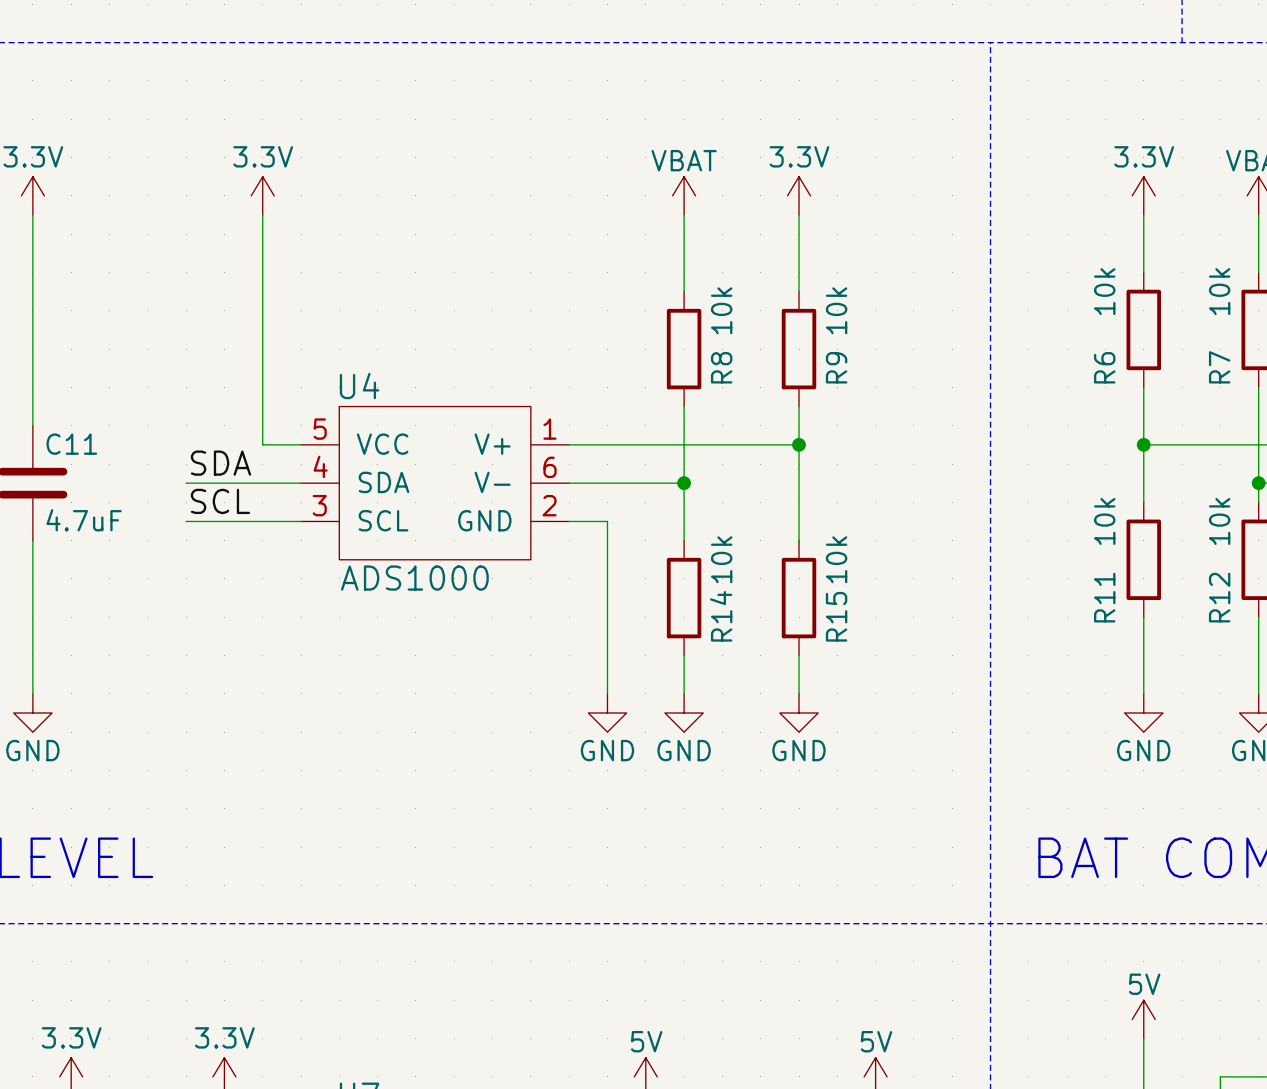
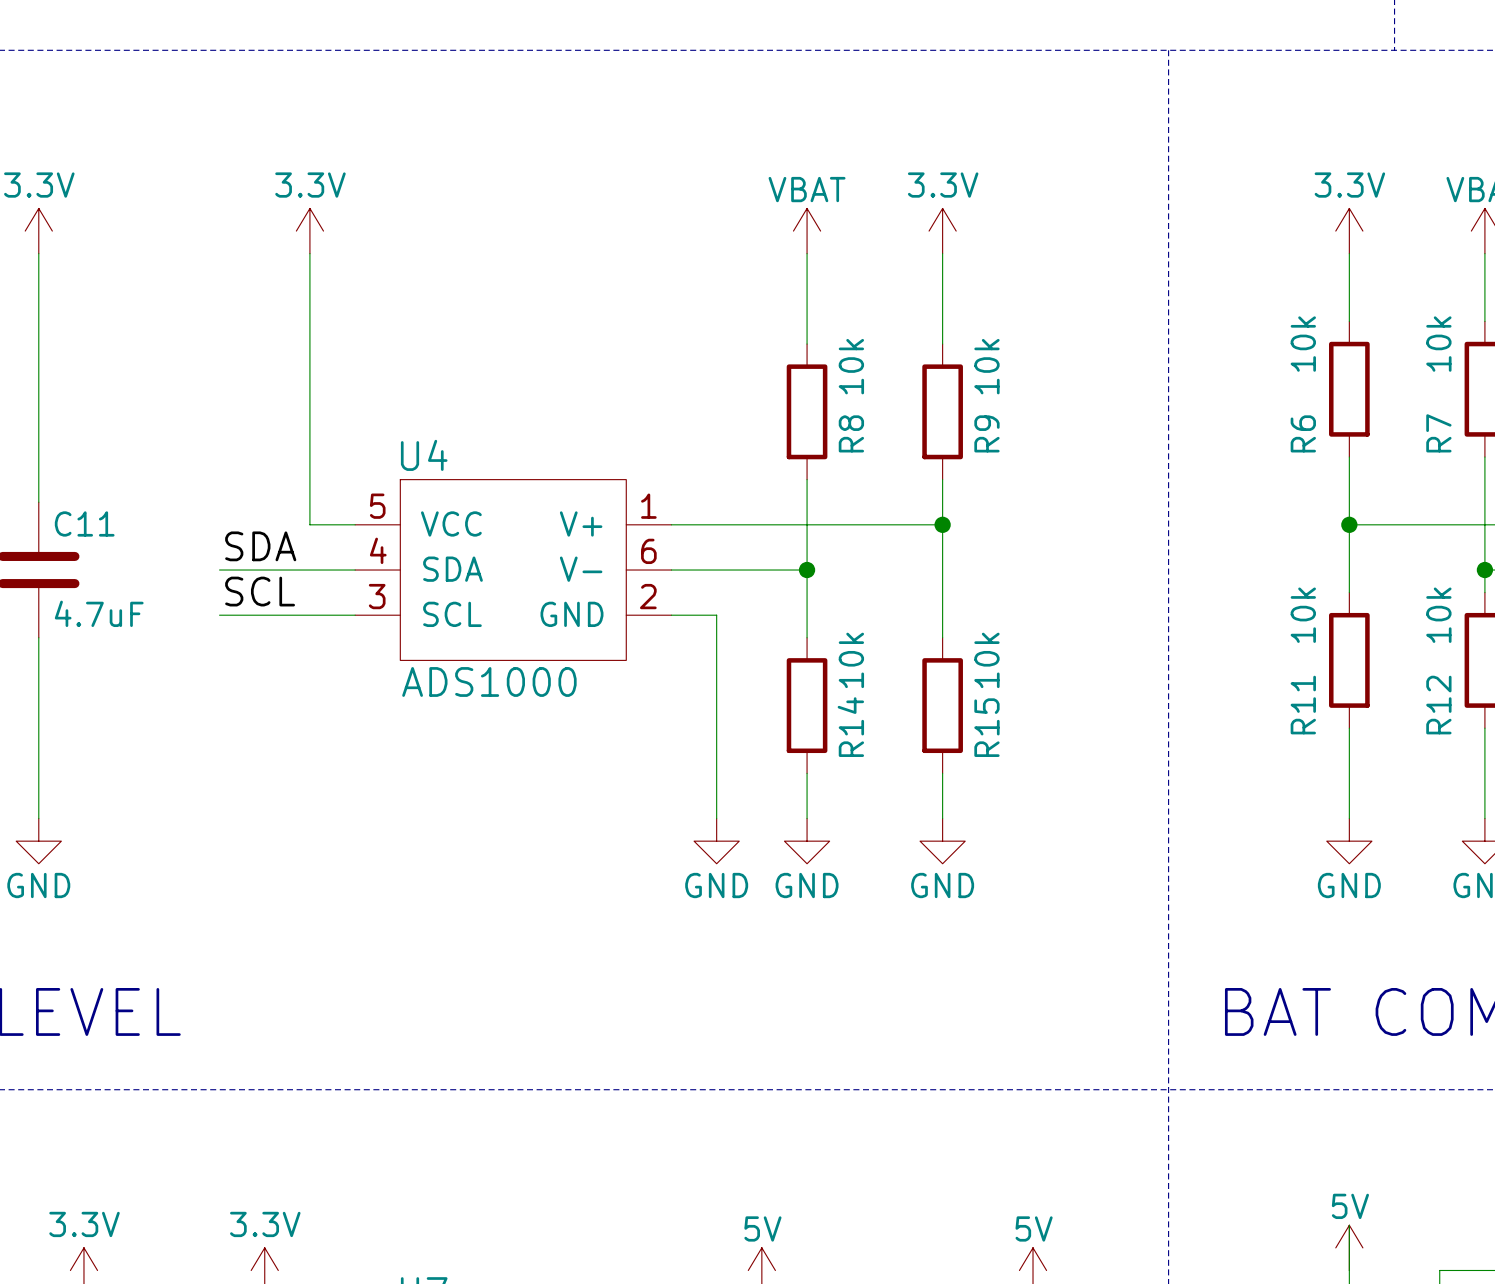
power symbol position: 5V (1143, 1019) -> 5V (1349, 1247)

